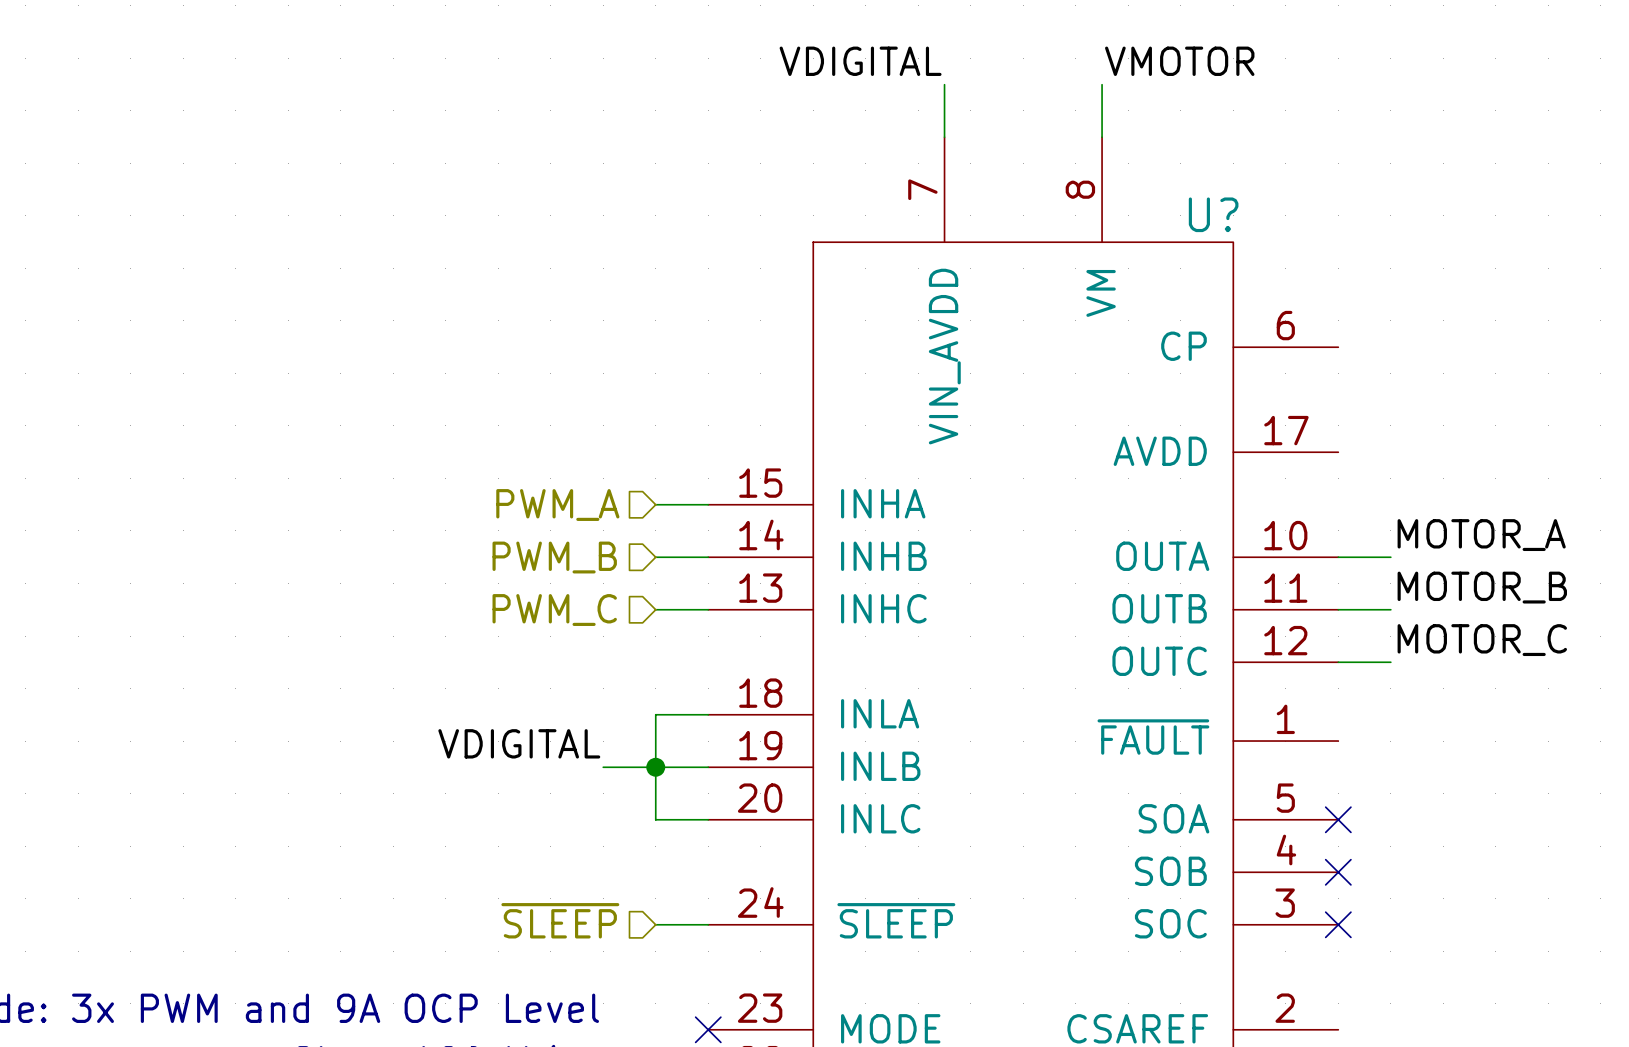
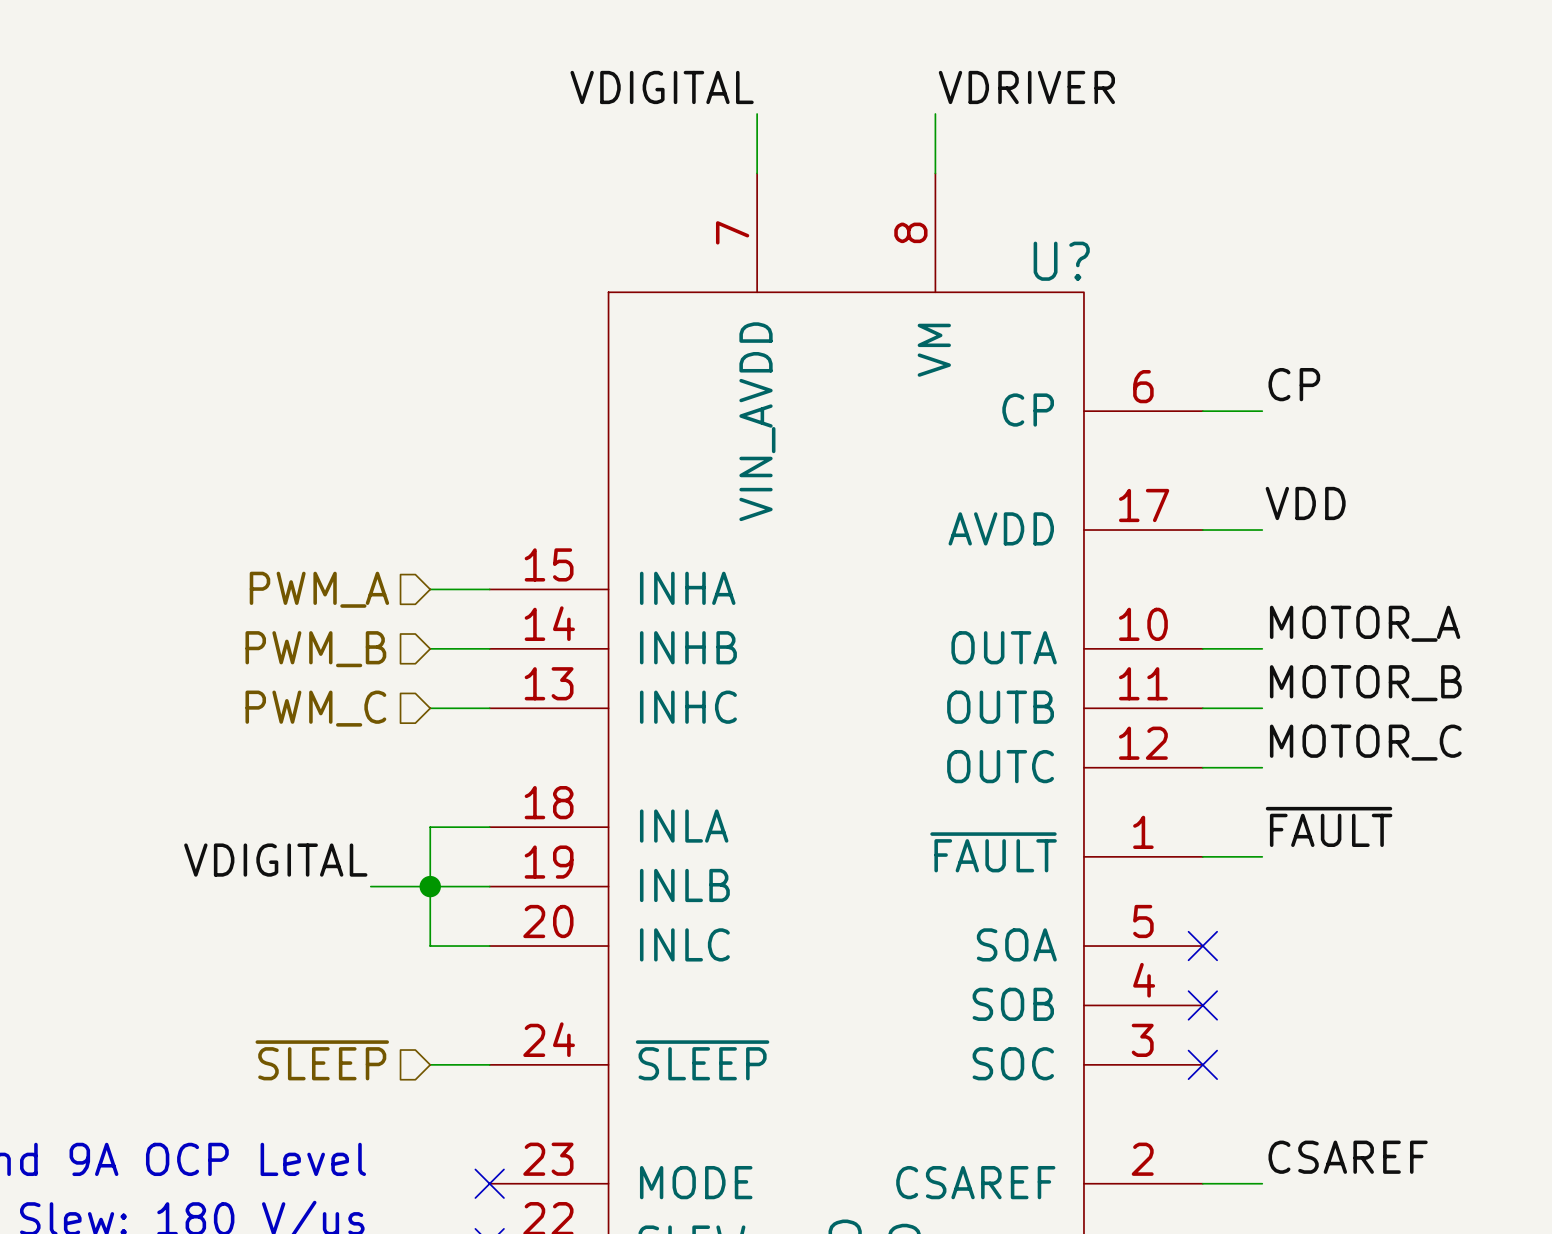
label: VMOTOR (1179, 61) -> VDRIVER (1026, 87)
label: none -> CP (1294, 384)
wire: none -> (1202, 411) (1262, 411)
label: none -> VDD (1305, 503)
wire: none -> (1202, 530) (1262, 530)
label: none -> ~{FAULT} (1329, 826)
wire: none -> (1202, 856) (1262, 856)
label: none -> CSAREF (1348, 1157)
wire: none -> (1202, 1183) (1262, 1183)

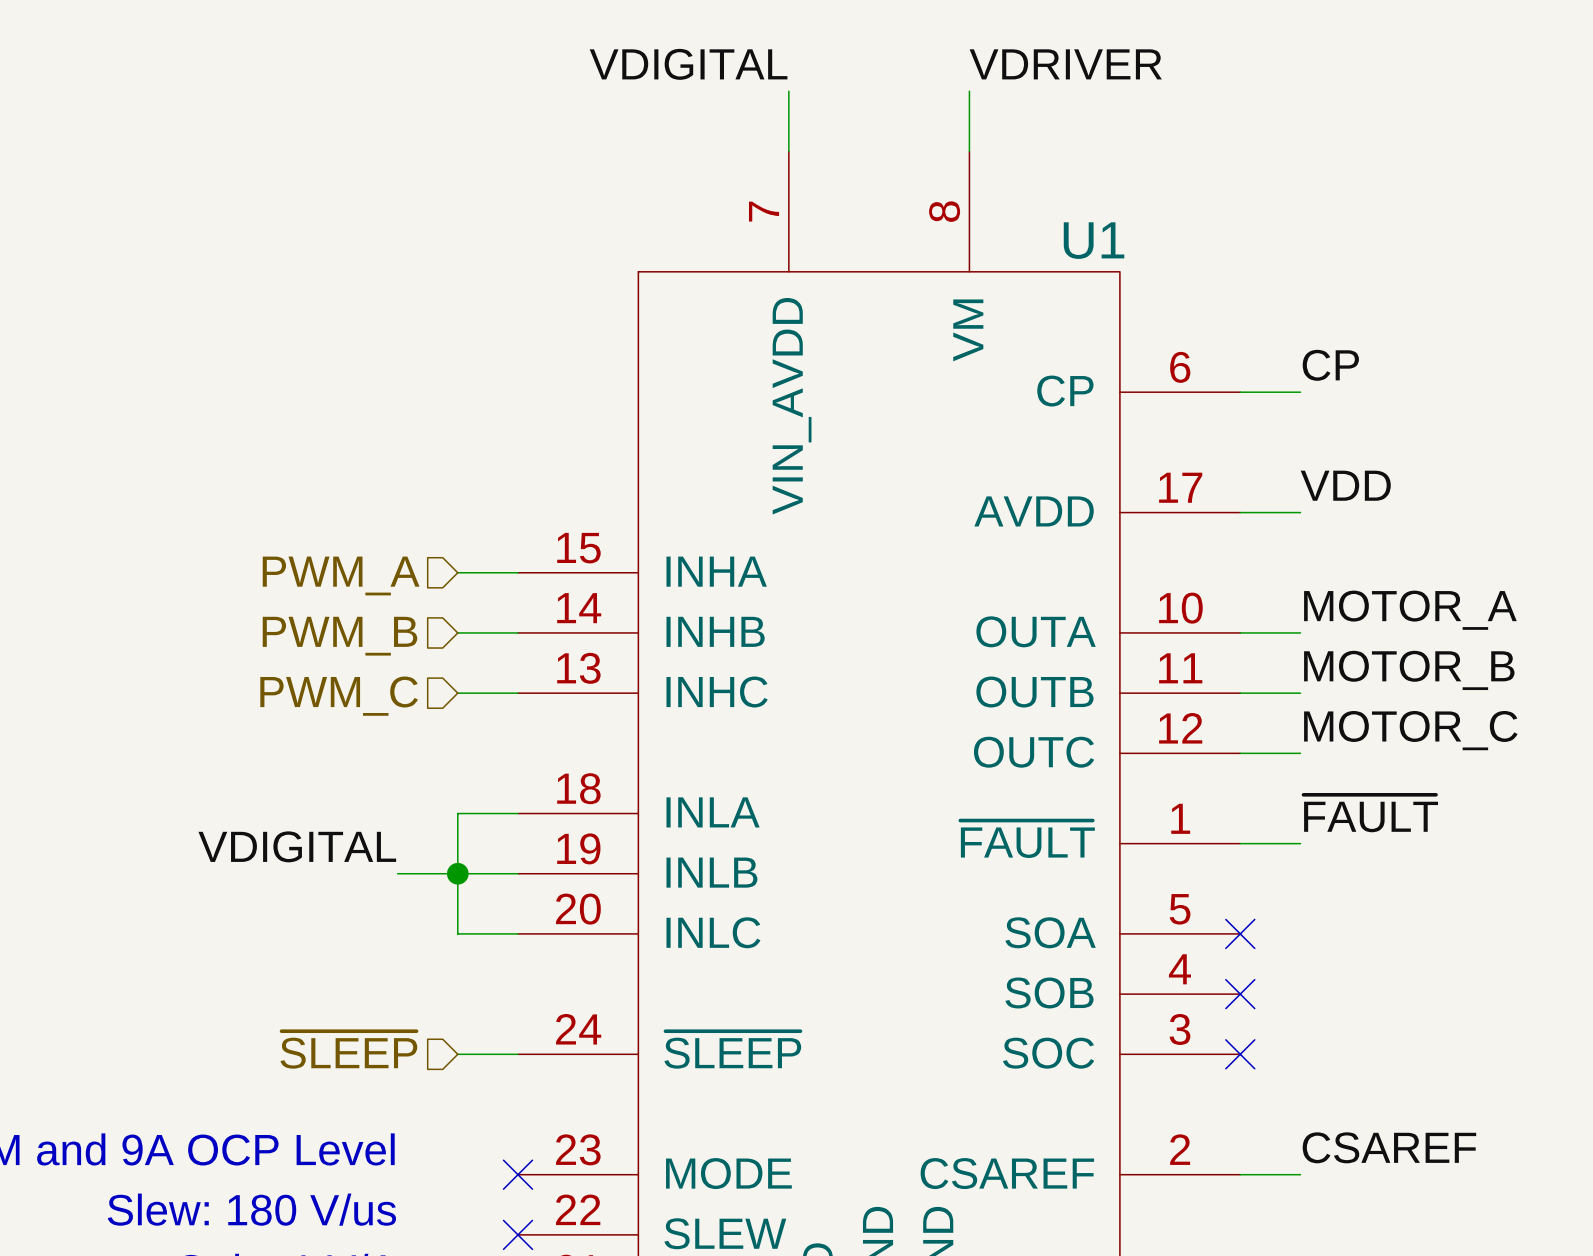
U? name: U? (1061, 261) -> U1 (1094, 240)

